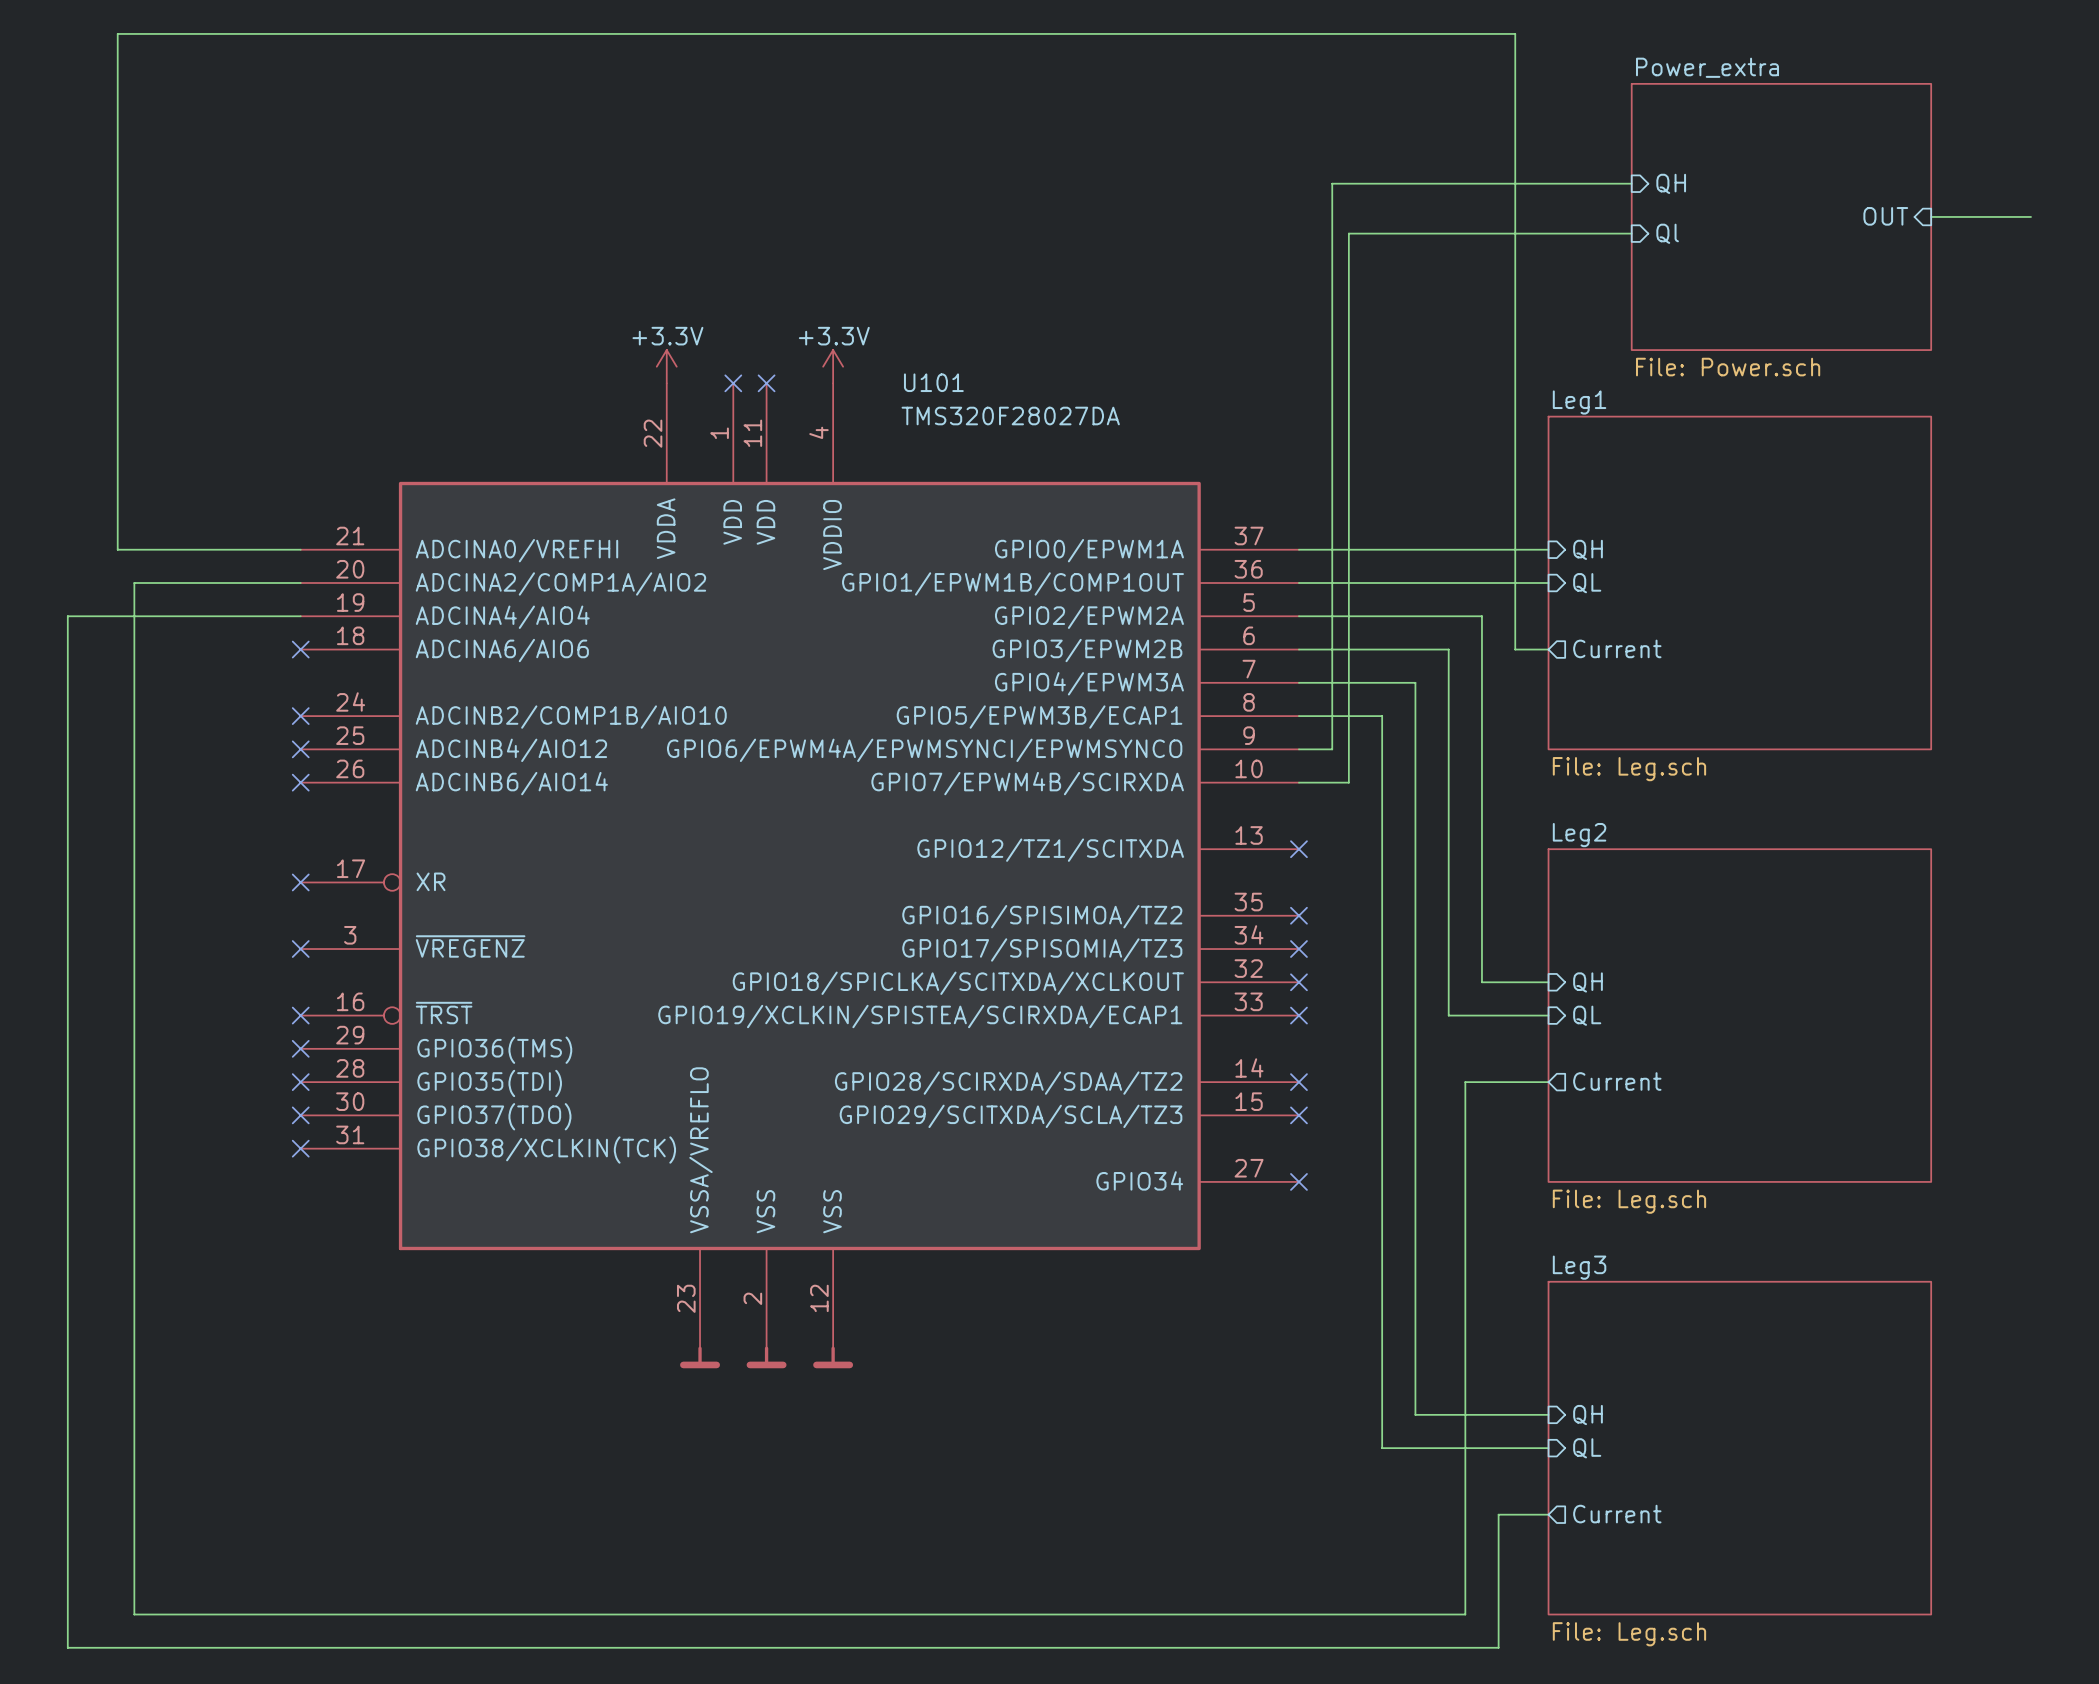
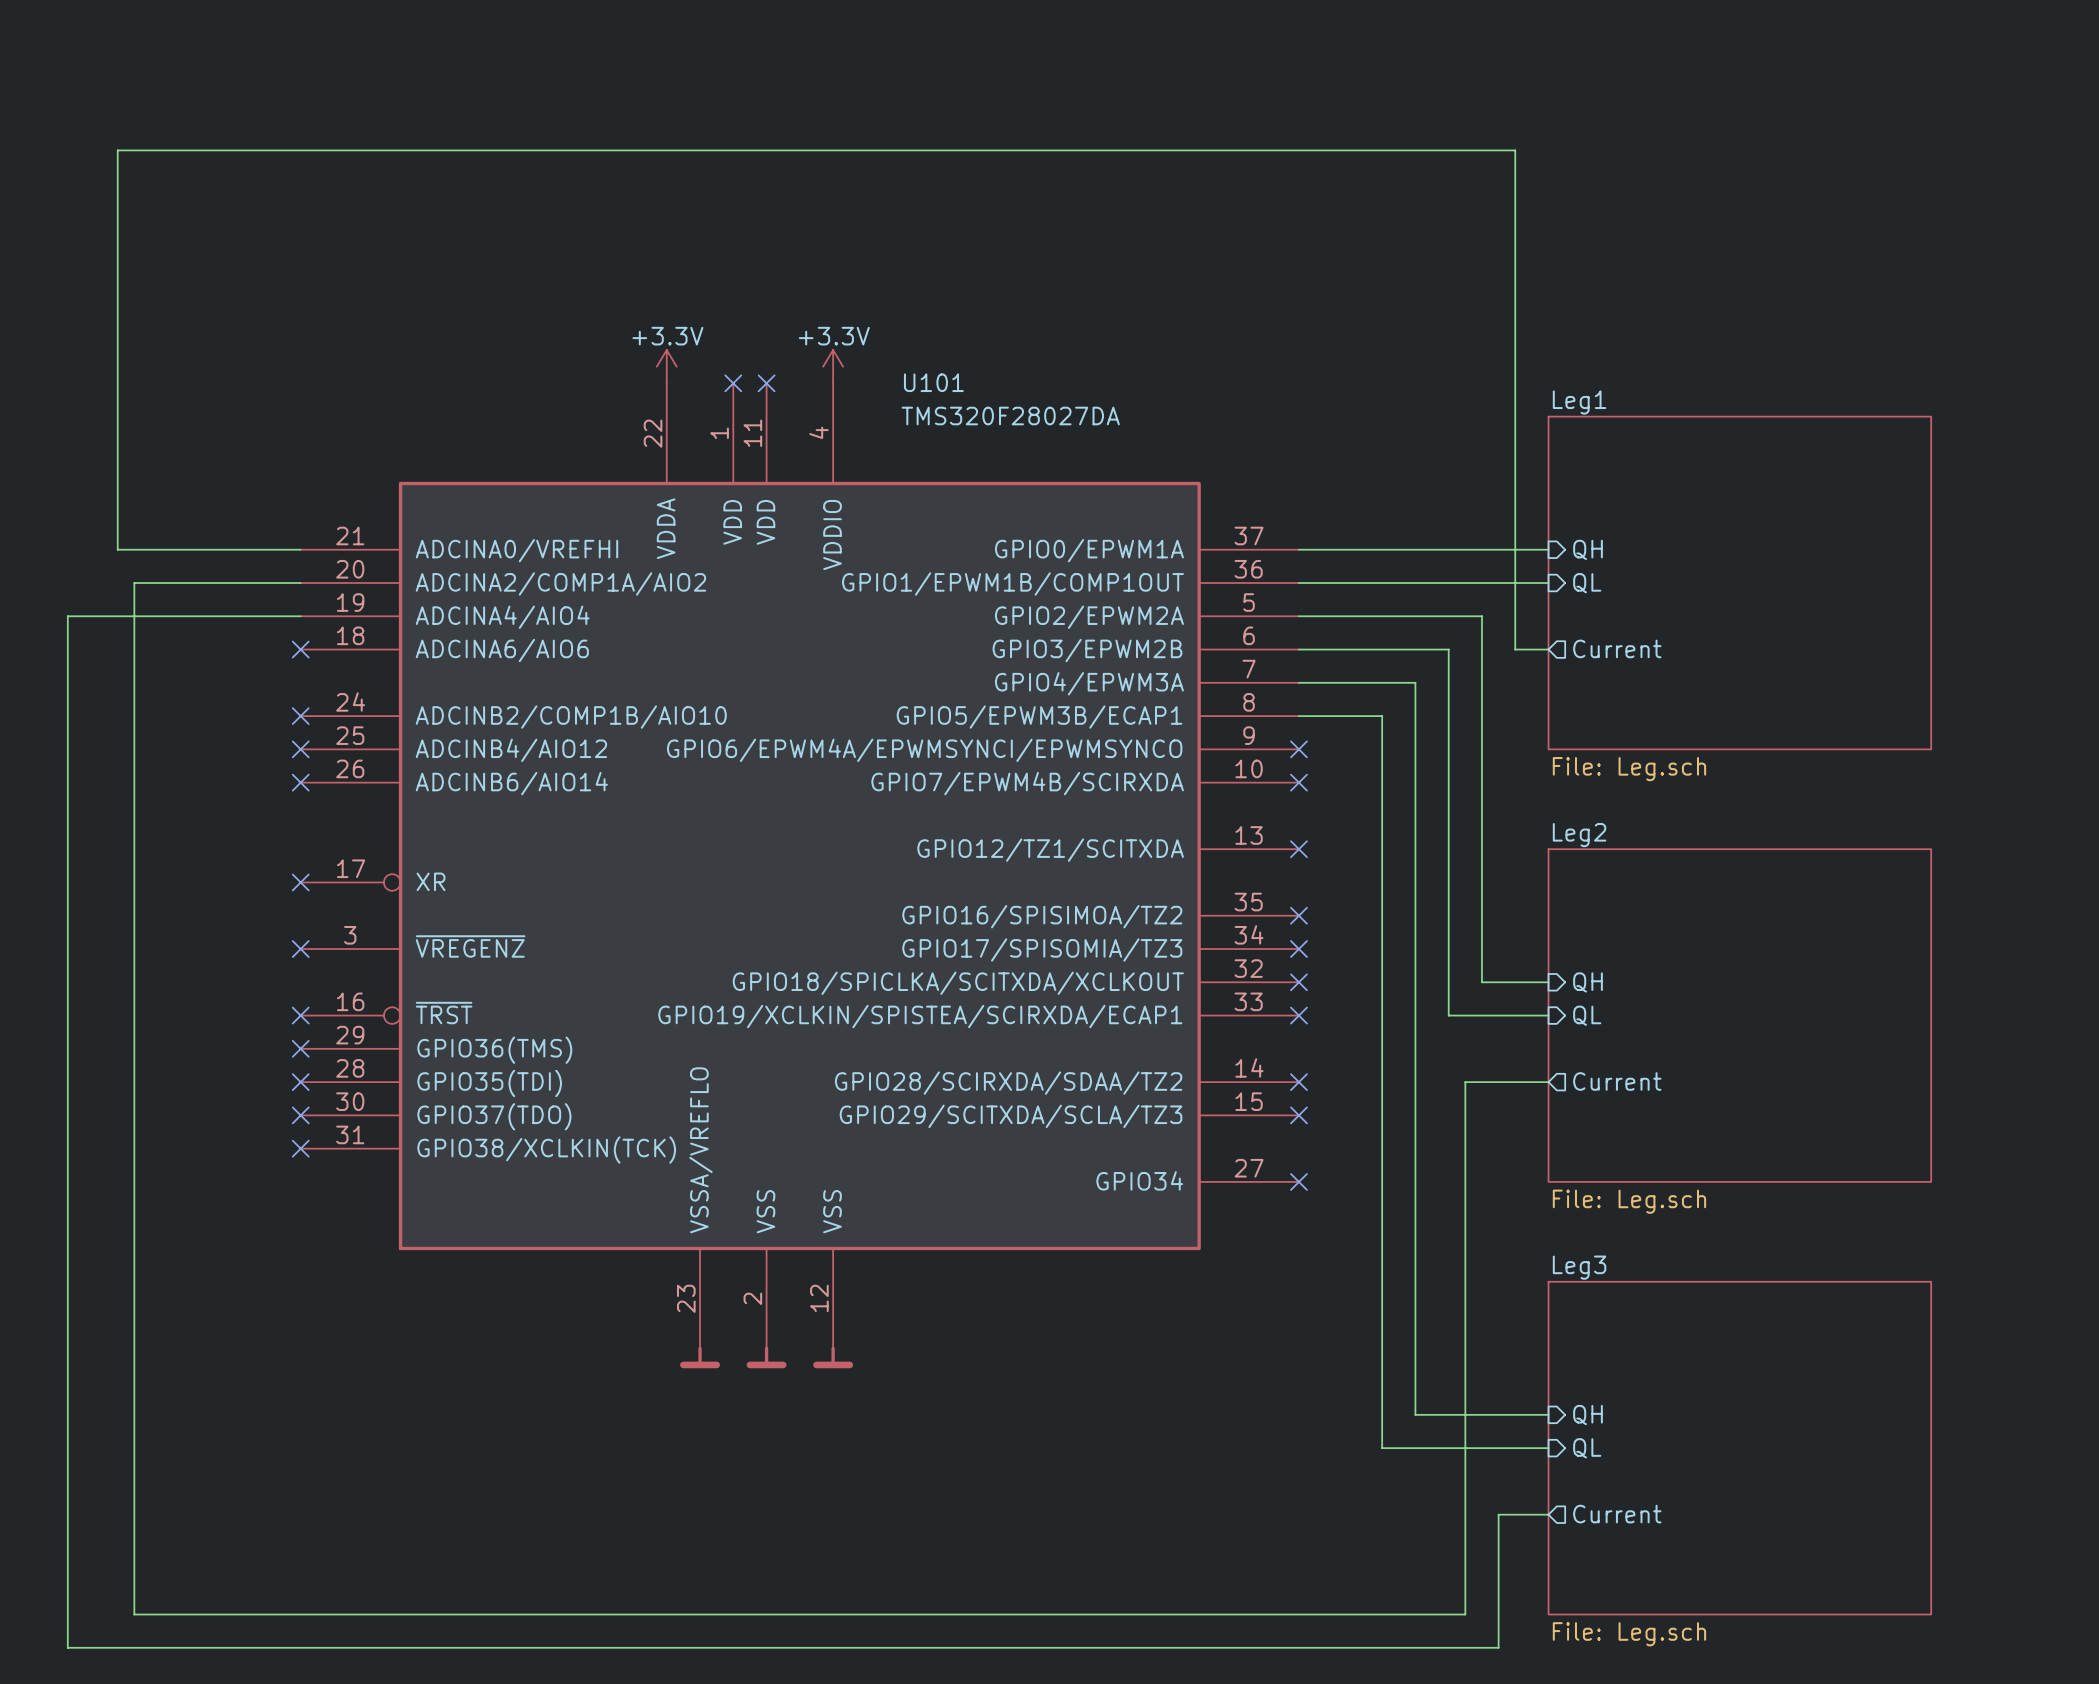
wire: (117, 150) (117, 33) (1515, 33) (1515, 150) -> (117, 150) (1515, 150)
wire: (1631, 183) (1332, 183) (1332, 749) (1298, 749) -> none
sheet pin: QH (1671, 183) -> none
sheet Power_extra: File: Power.sch (1781, 216) -> none
sheet pin: OUT (1885, 216) -> none
wire: (1931, 216) (2031, 216) -> none
wire: (1631, 233) (1348, 233) (1348, 782) (1298, 782) -> none
sheet pin: Ql (1667, 233) -> none
no-connect mark: none -> (1298, 749)
no-connect mark: none -> (1298, 782)

